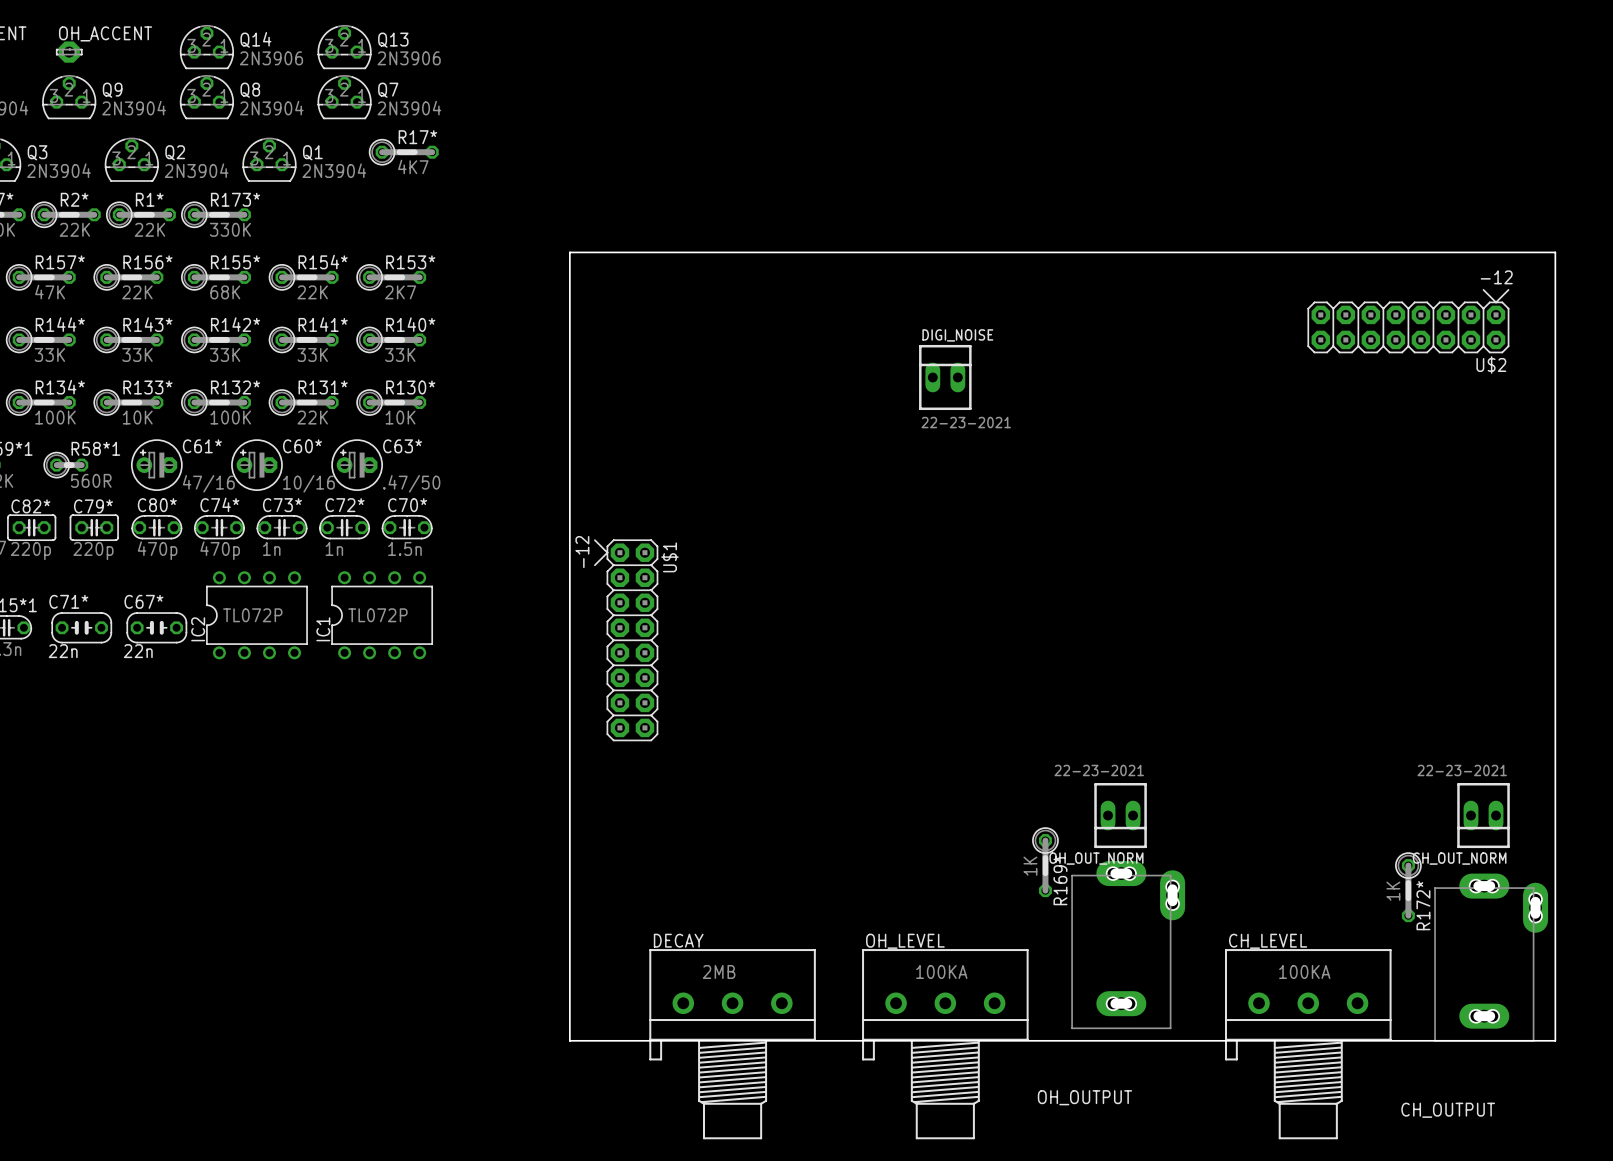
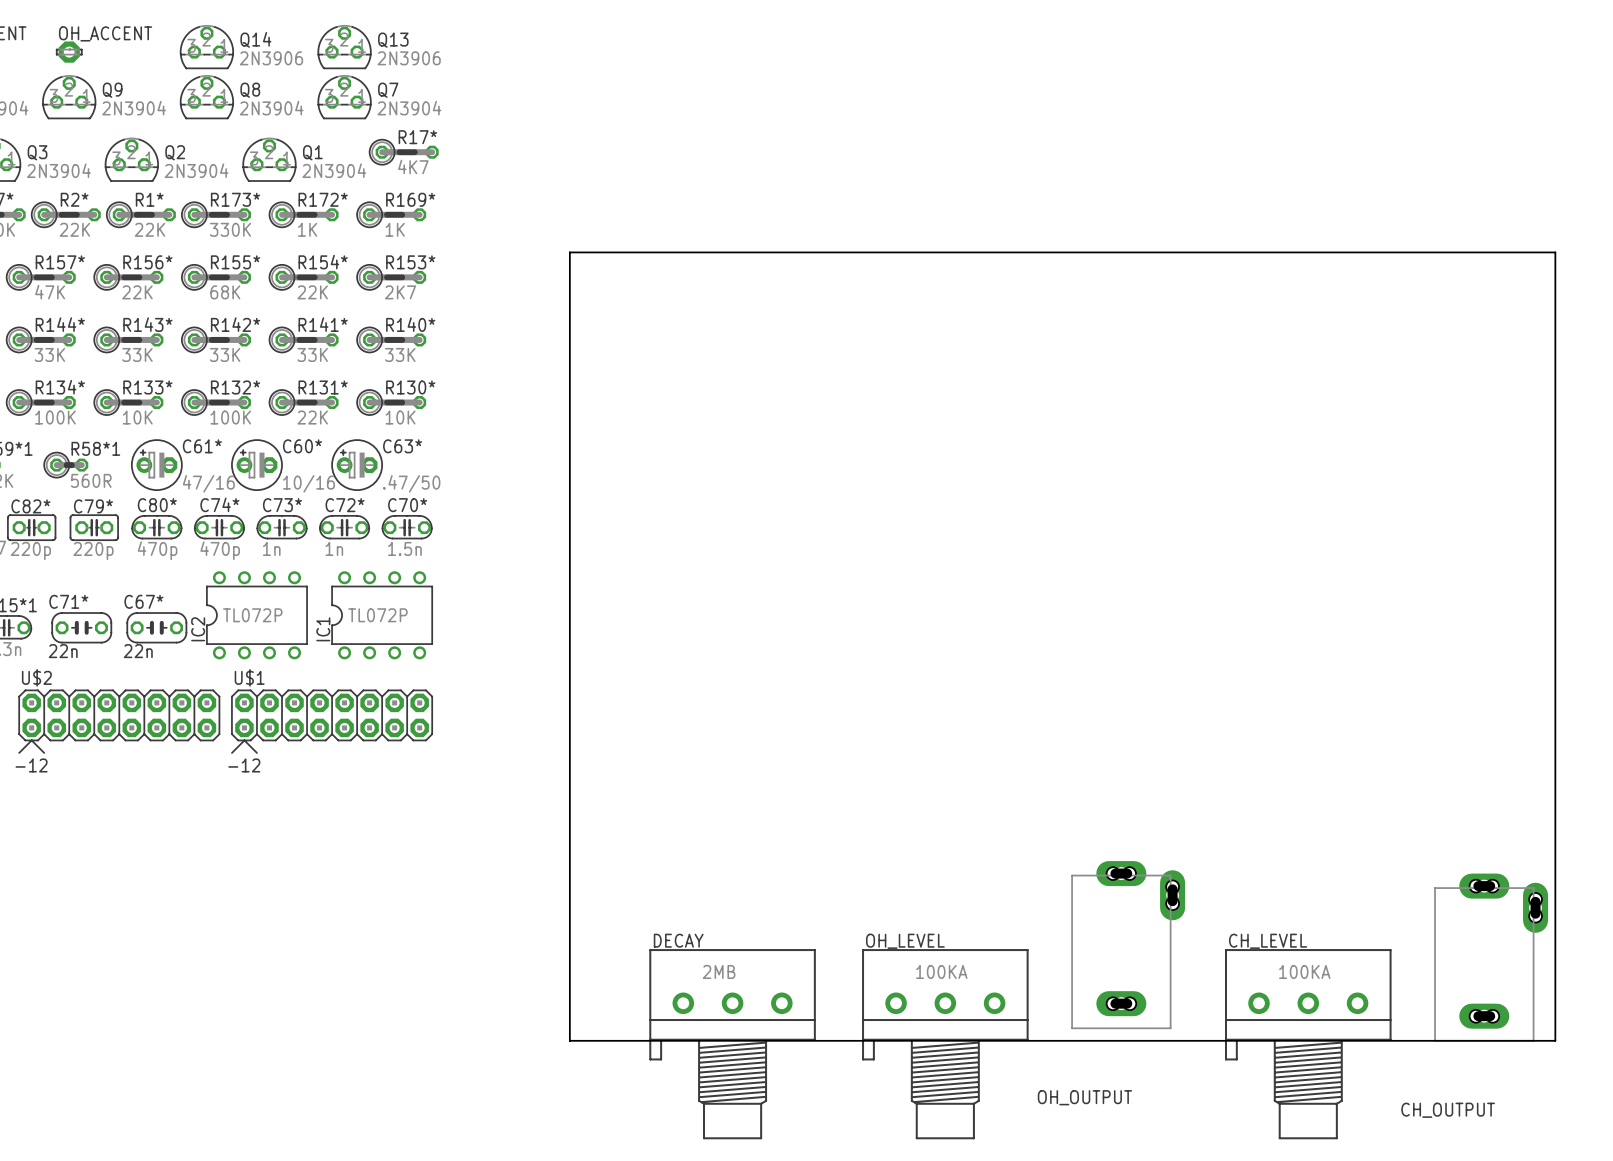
U$2 footprint: [1307, 289, 1510, 354] -> [18, 689, 221, 754]
U$2 name position: U$2 (1491, 364) -> U$2 (36, 677)
DIGI_NOISE: 22-23-2021 (945, 377) -> none
U$1 footprint: [594, 539, 659, 742] -> [231, 689, 433, 754]
U$1 name position: U$1 (669, 557) -> U$1 (249, 677)
OH_OUT_NORM: 22-23-2021 (1120, 815) -> none
CH_OUT_NORM: 22-23-2021 (1483, 815) -> none
R169* rotation: 0° (1045, 862) -> 90° counterclockwise (391, 214)
R169* position: (1045, 862) -> (391, 214)
R172* rotation: 0° (1408, 887) -> 90° counterclockwise (303, 214)
R172* position: (1408, 887) -> (303, 214)

